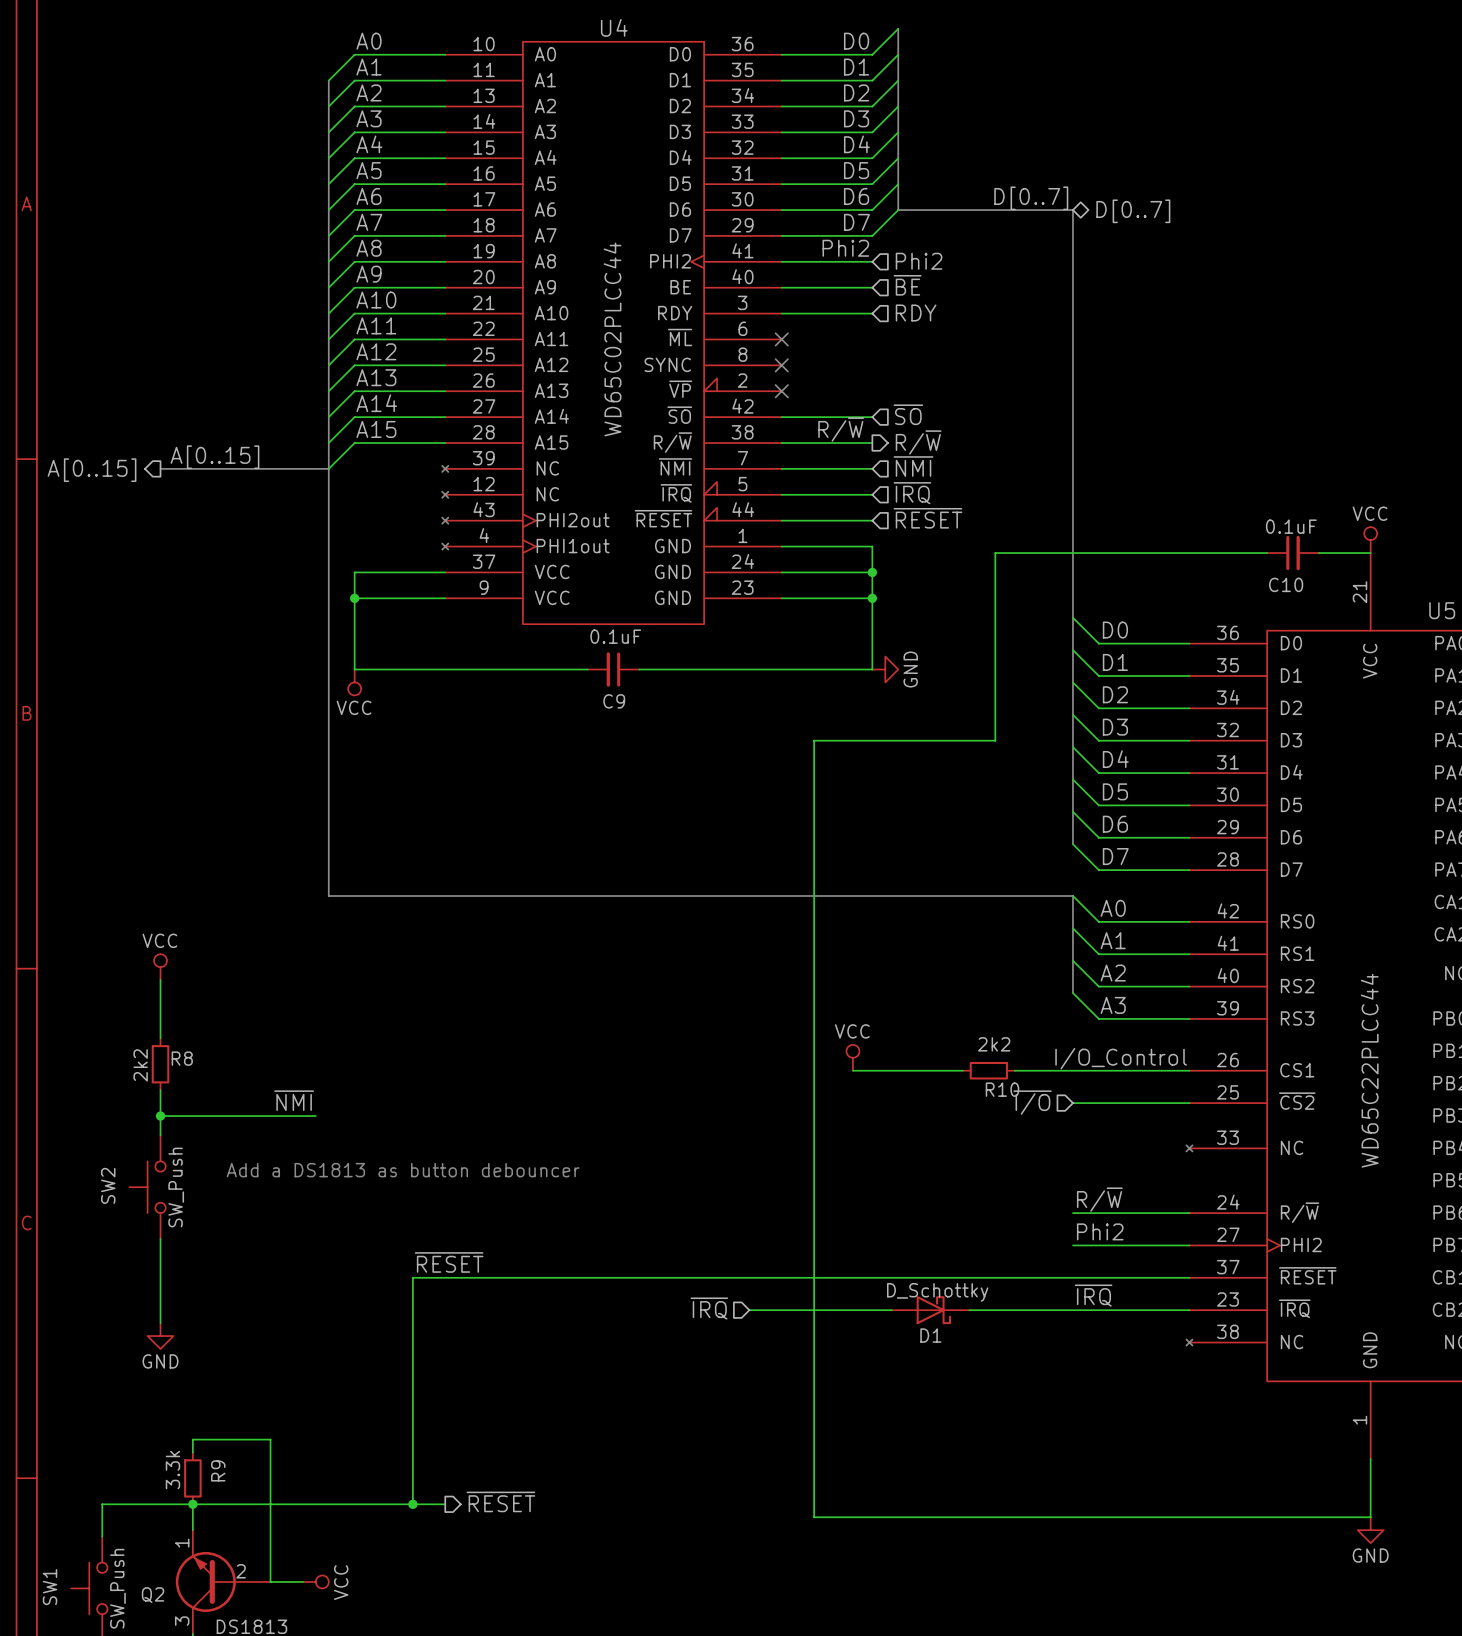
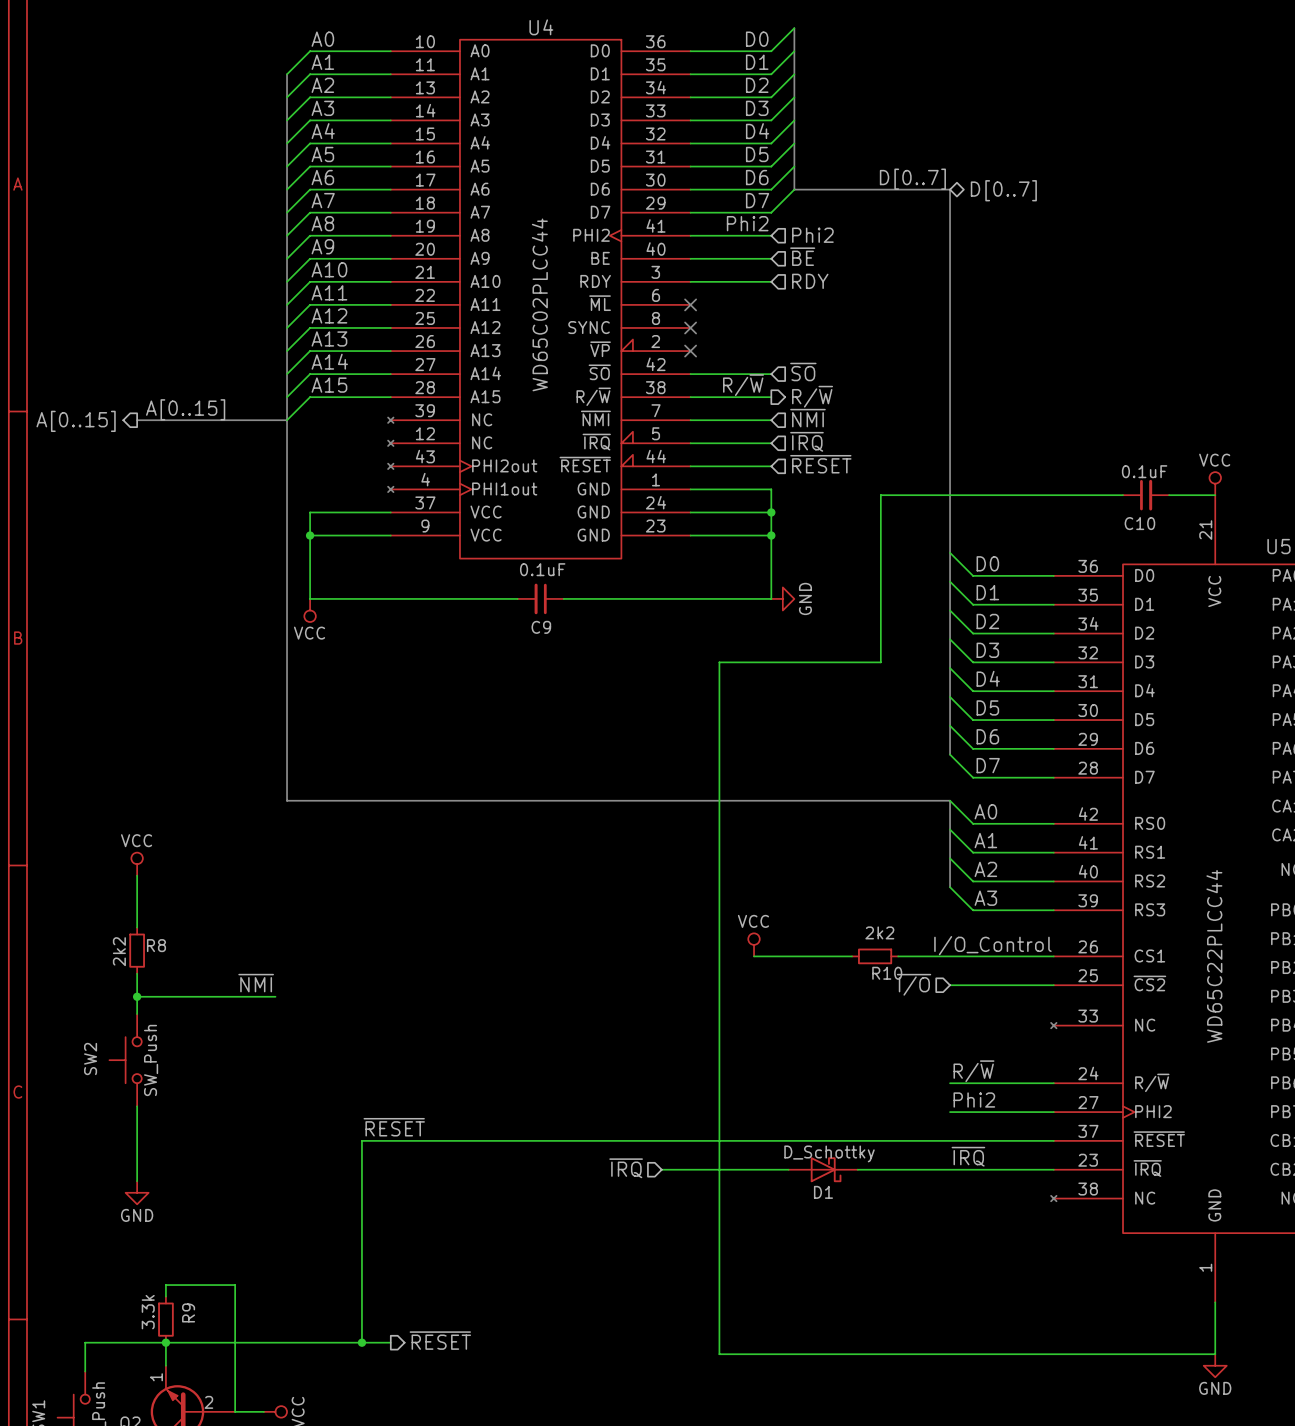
text: Add a DS1813 as button debouncer (403, 1170) -> none

